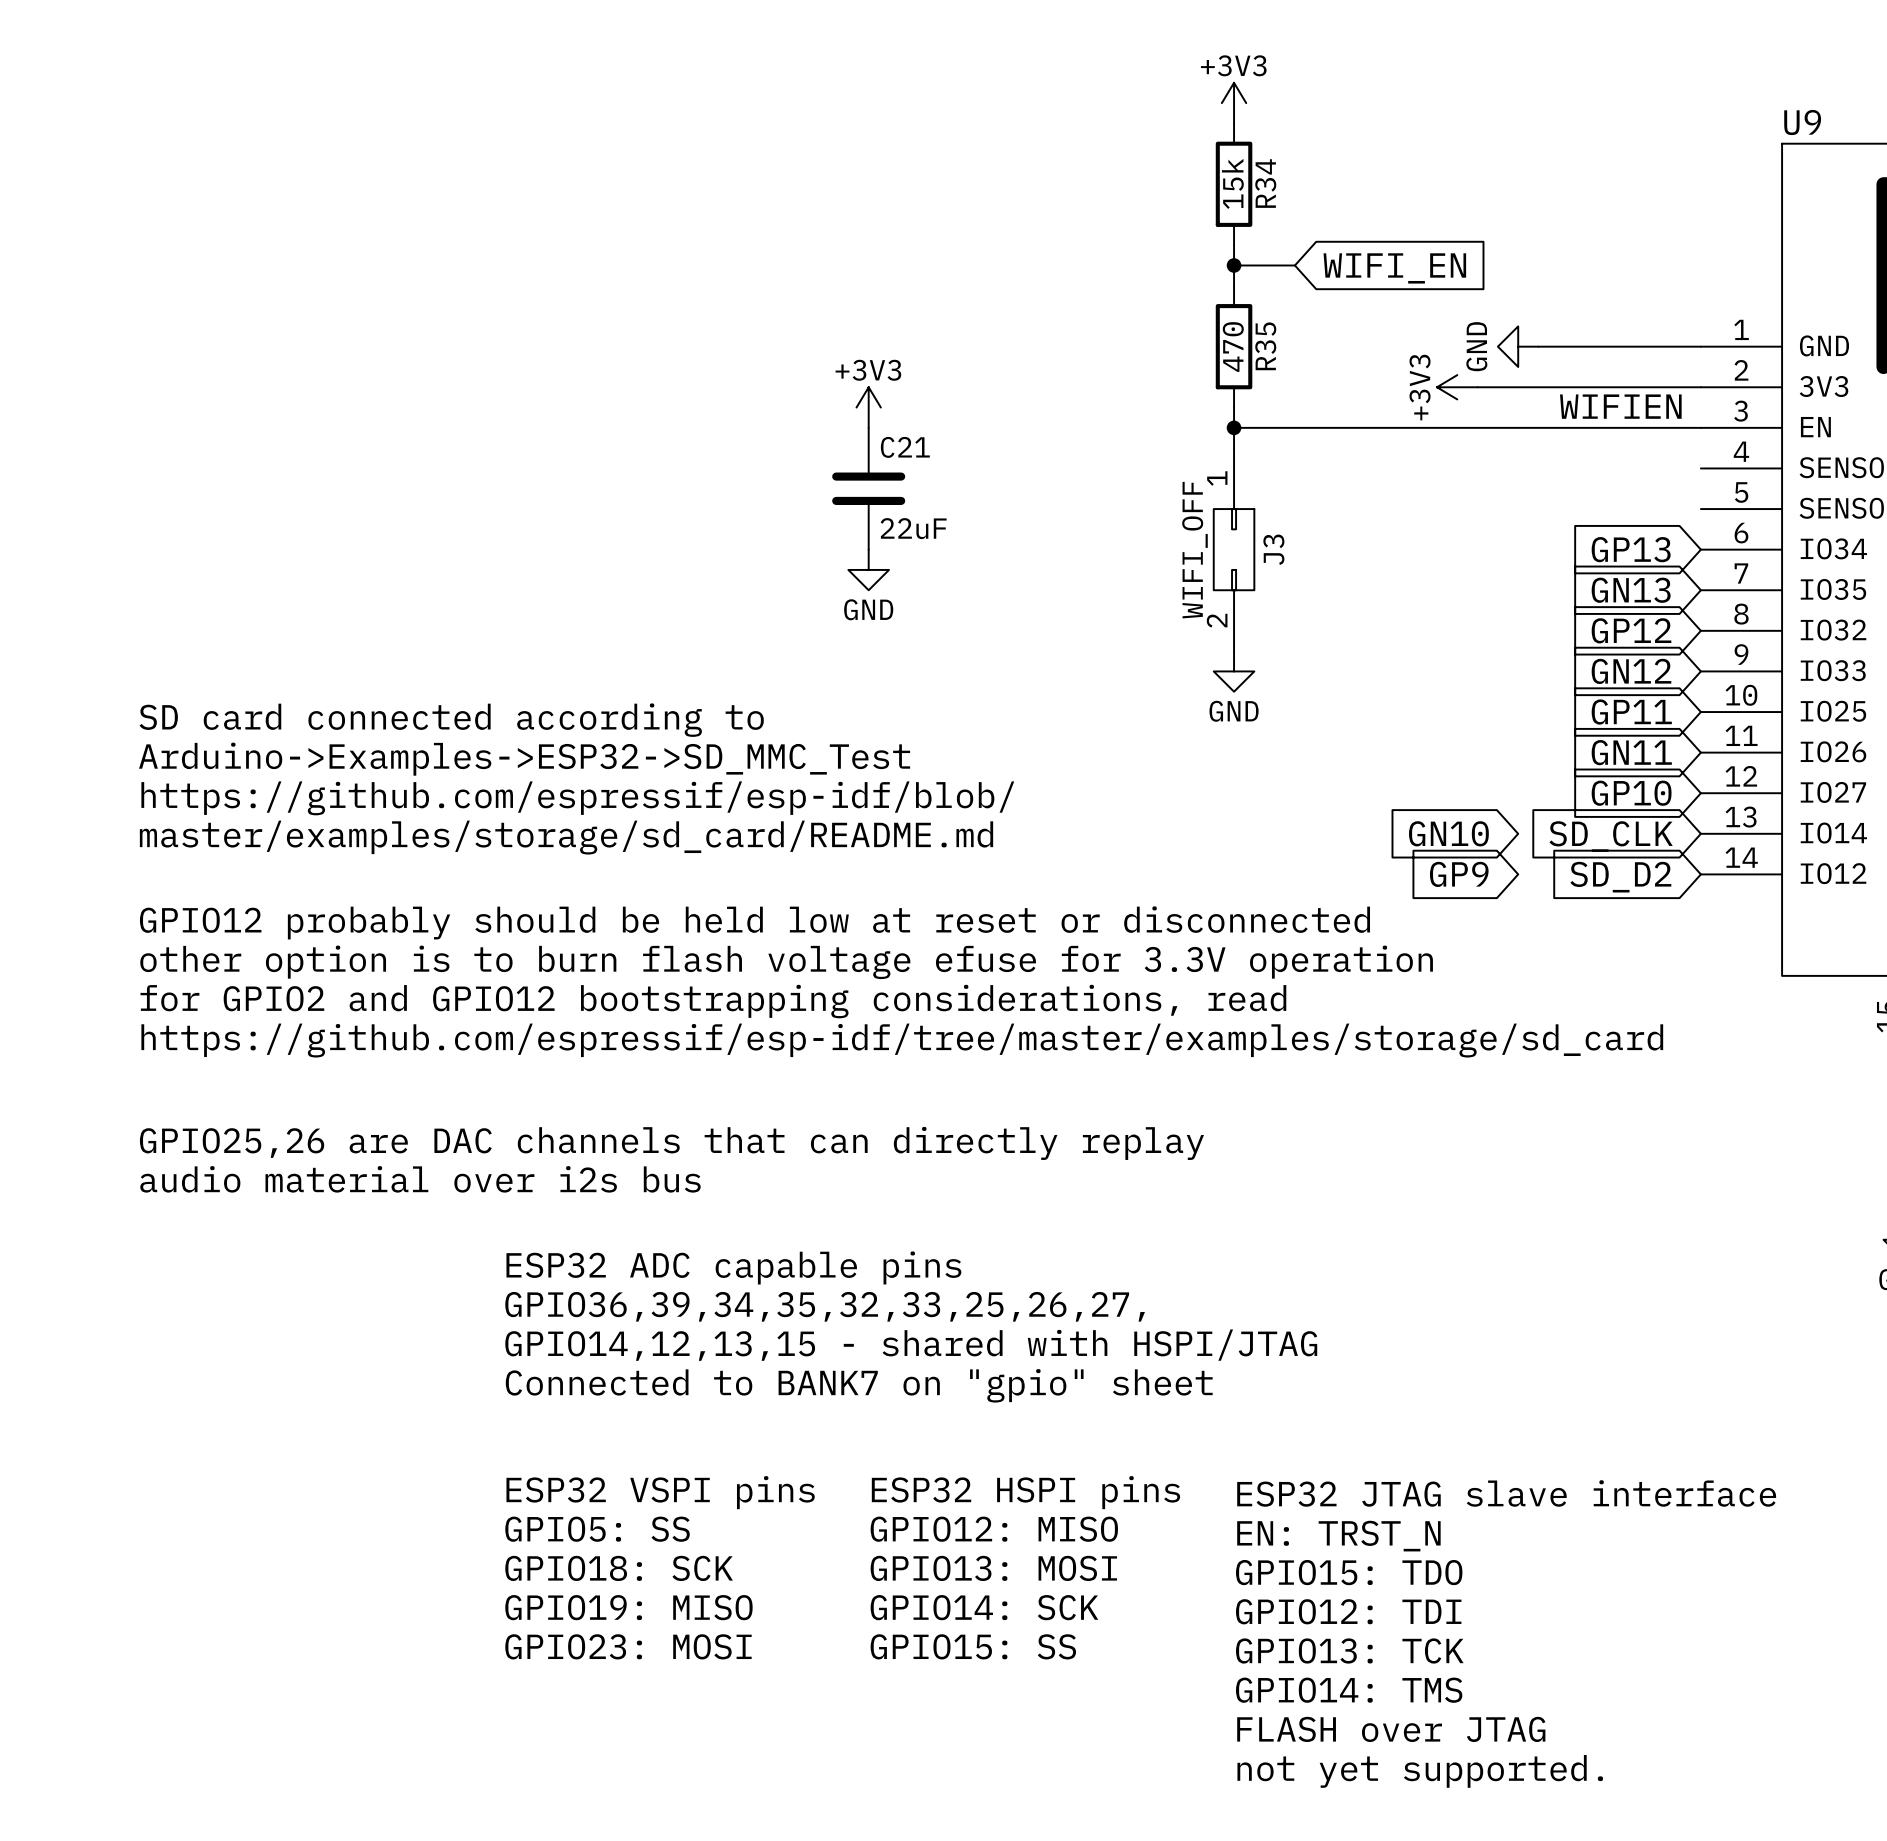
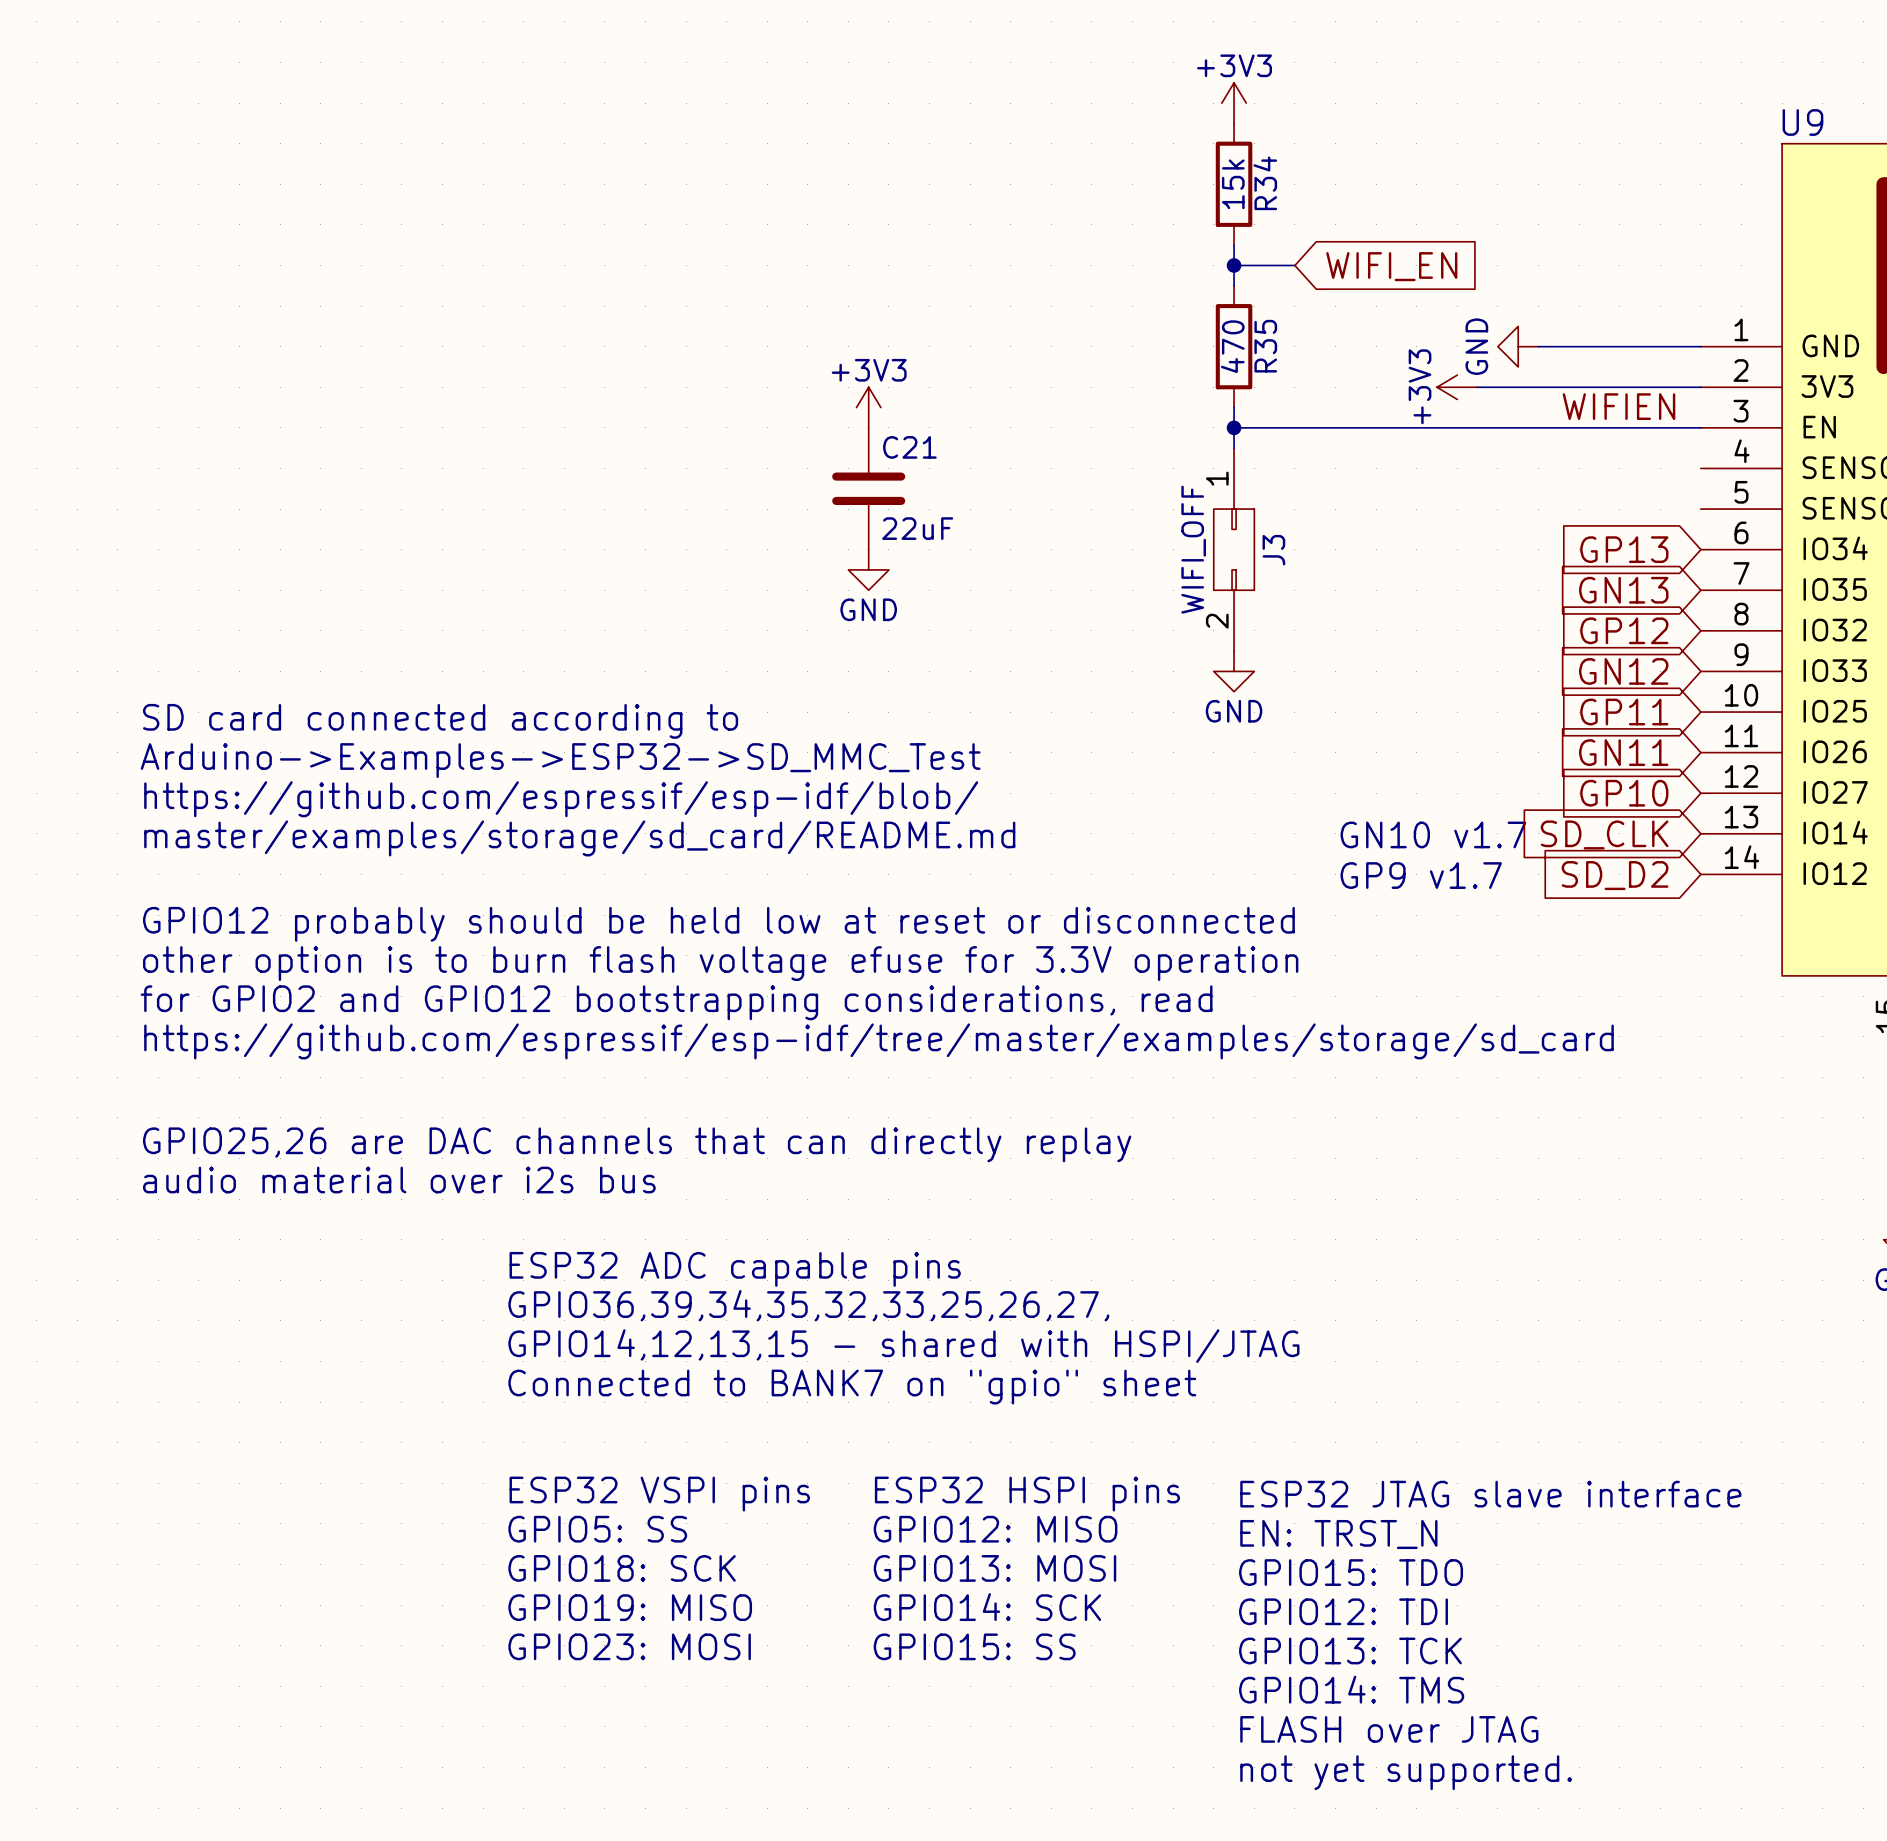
global label: GN10 (1448, 833) -> none
text: none -> GN10 v1.7 (1433, 834)
global label: GP9 (1459, 874) -> none
text: none -> GP9 v1.7 (1421, 875)

